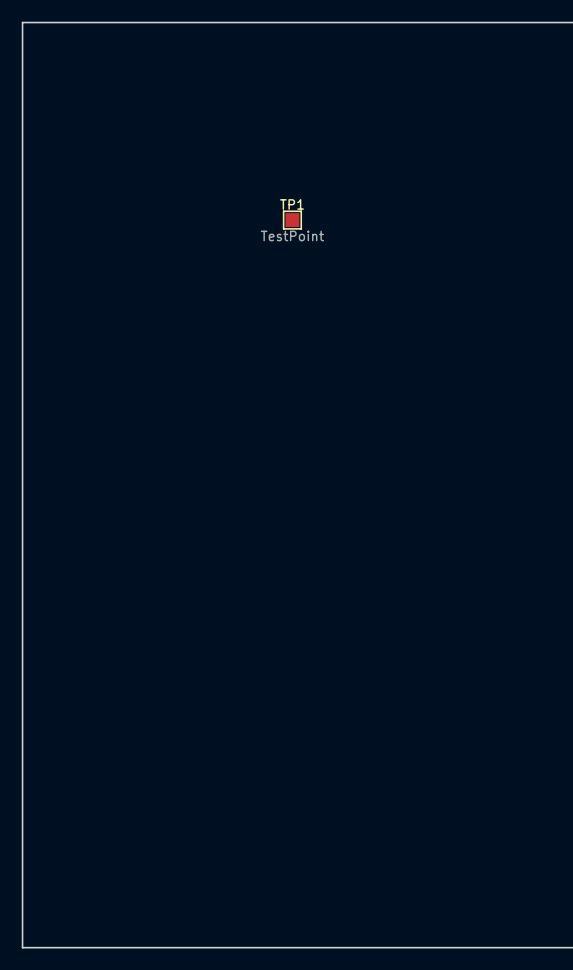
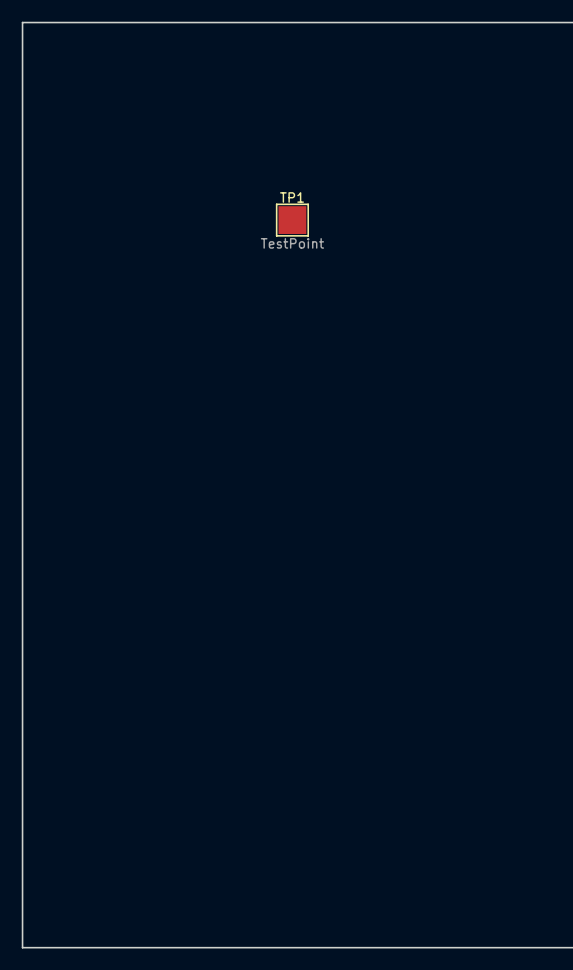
TP1 footprint: [283, 210, 302, 230] -> [276, 203, 309, 237]

